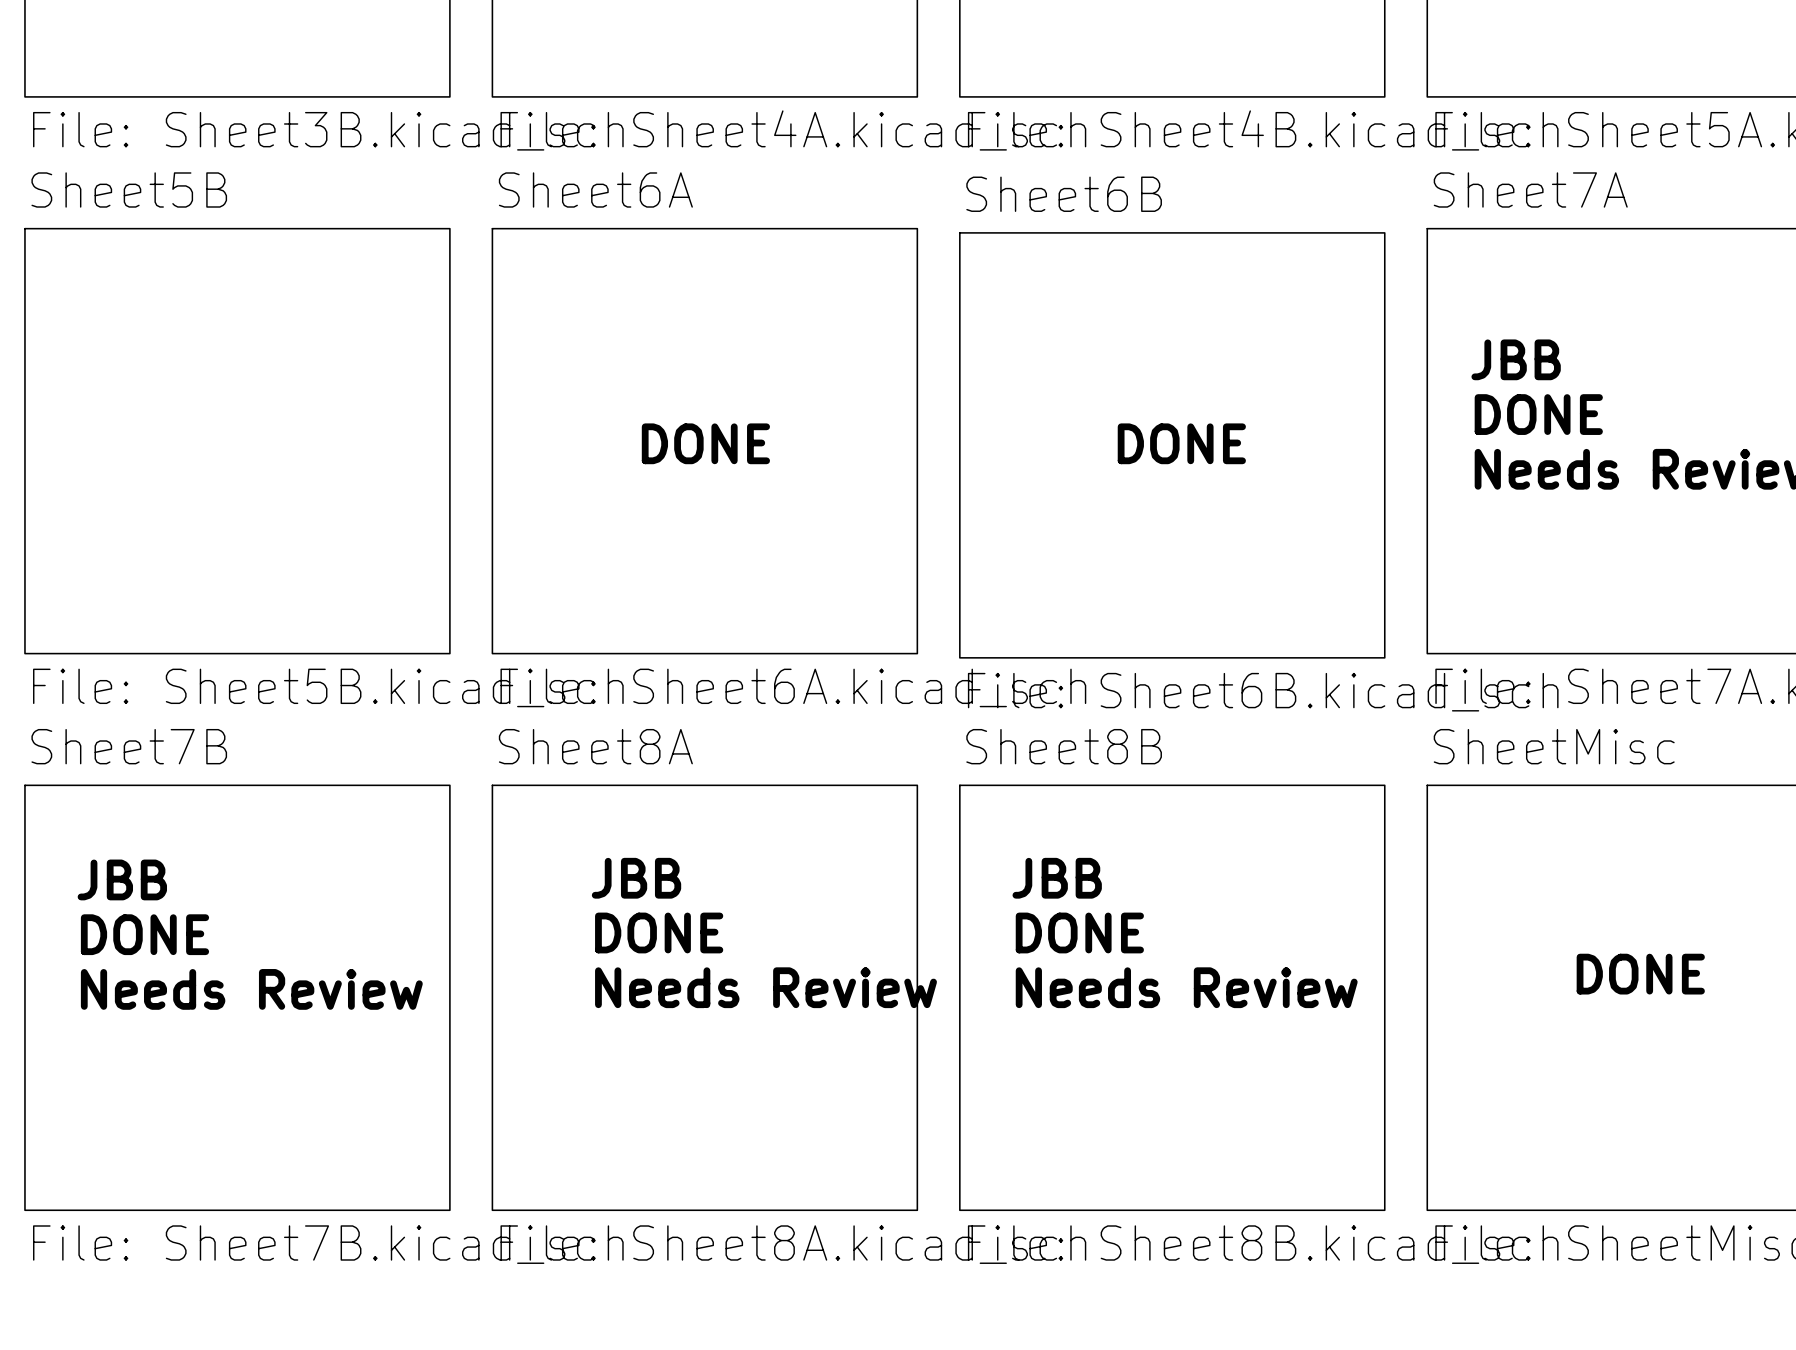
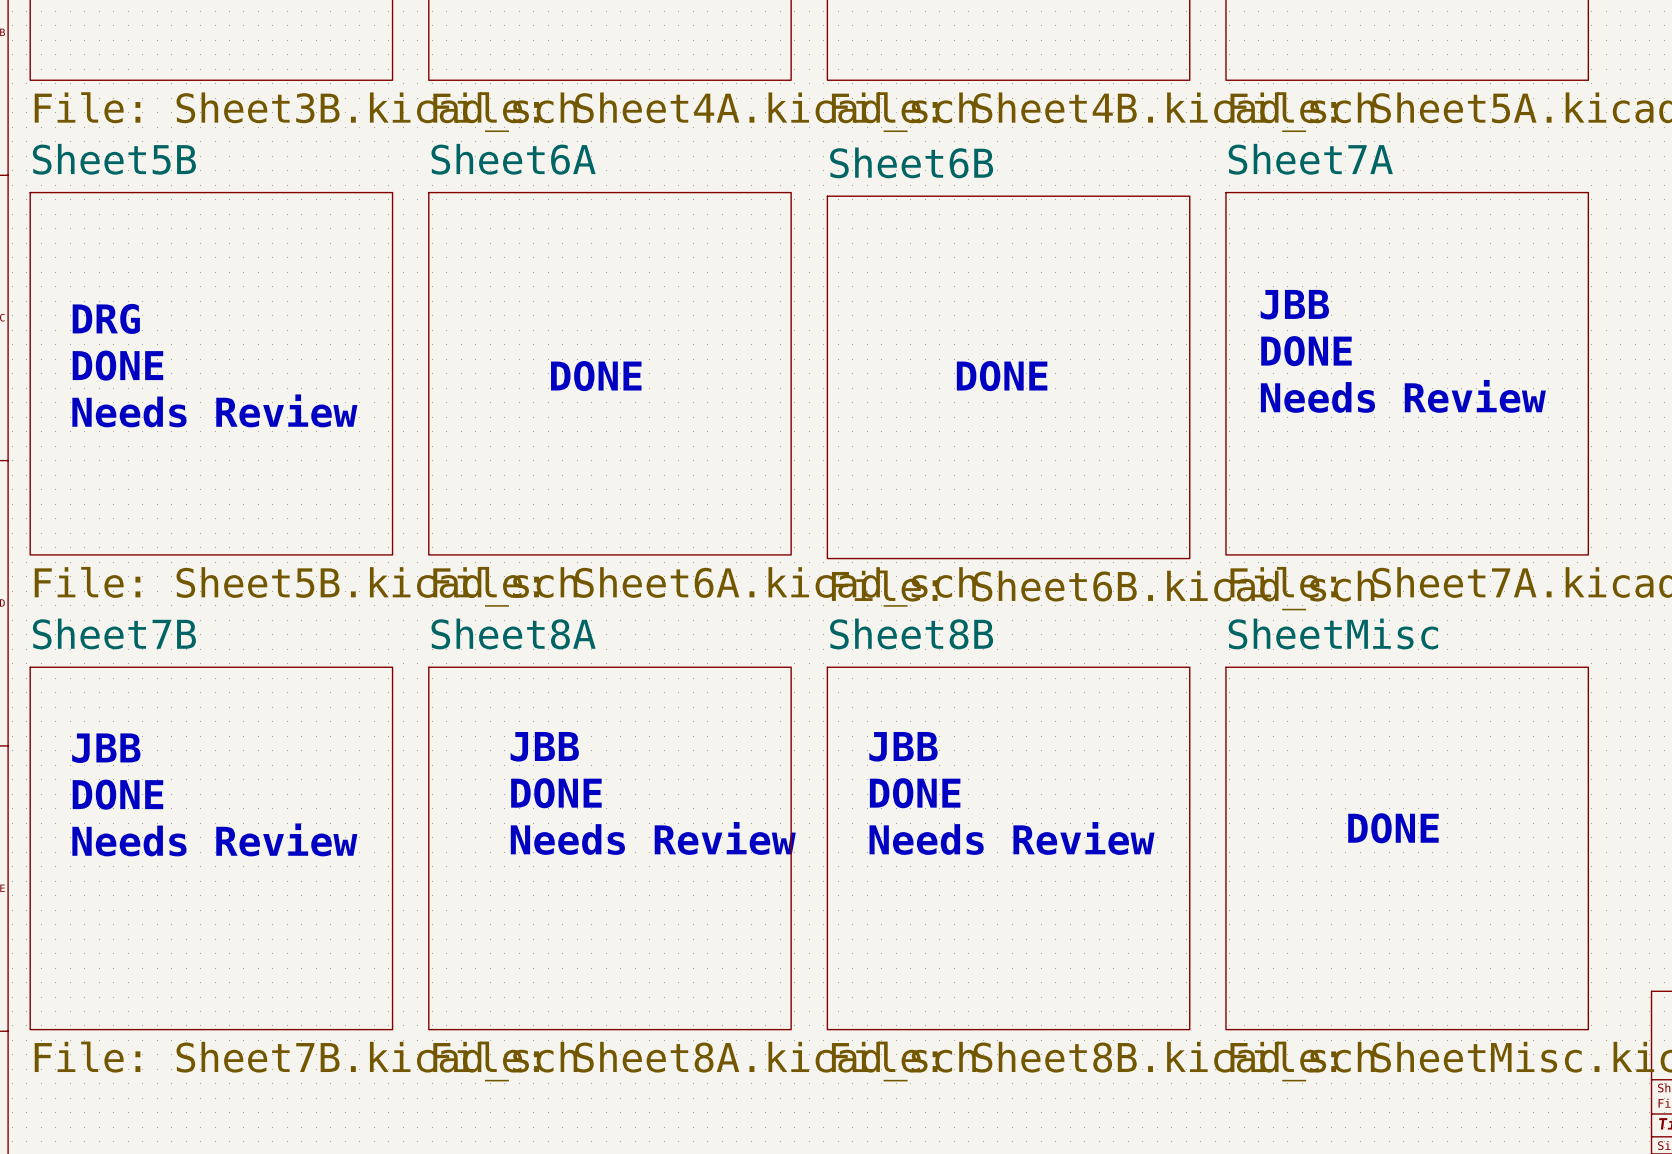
text: none -> DRG (106, 318)
text: none -> DONE (117, 365)
text: none -> Needs Review (214, 410)

